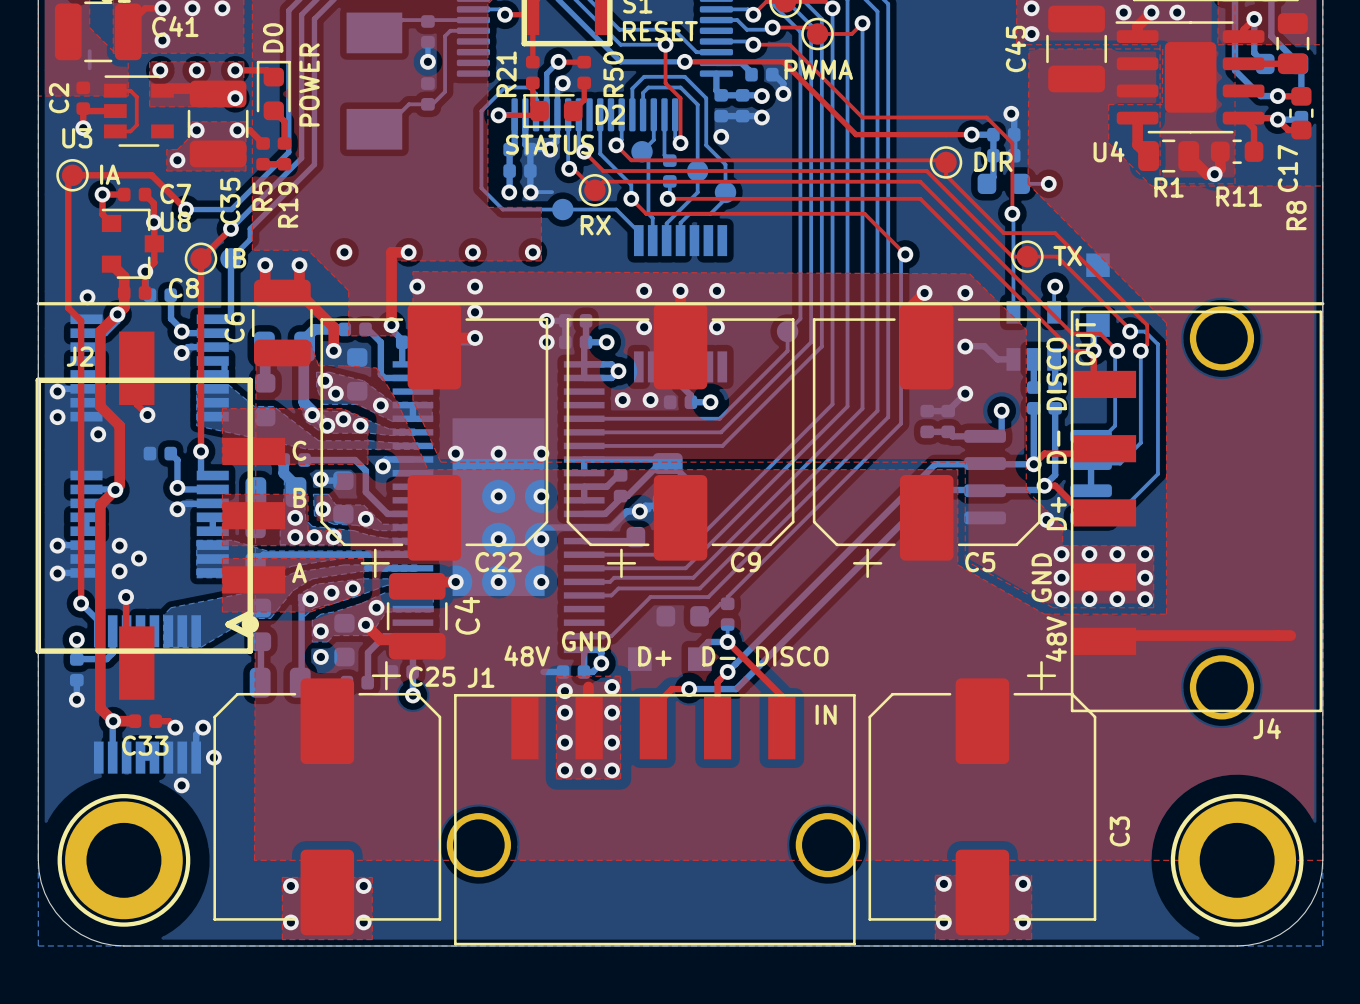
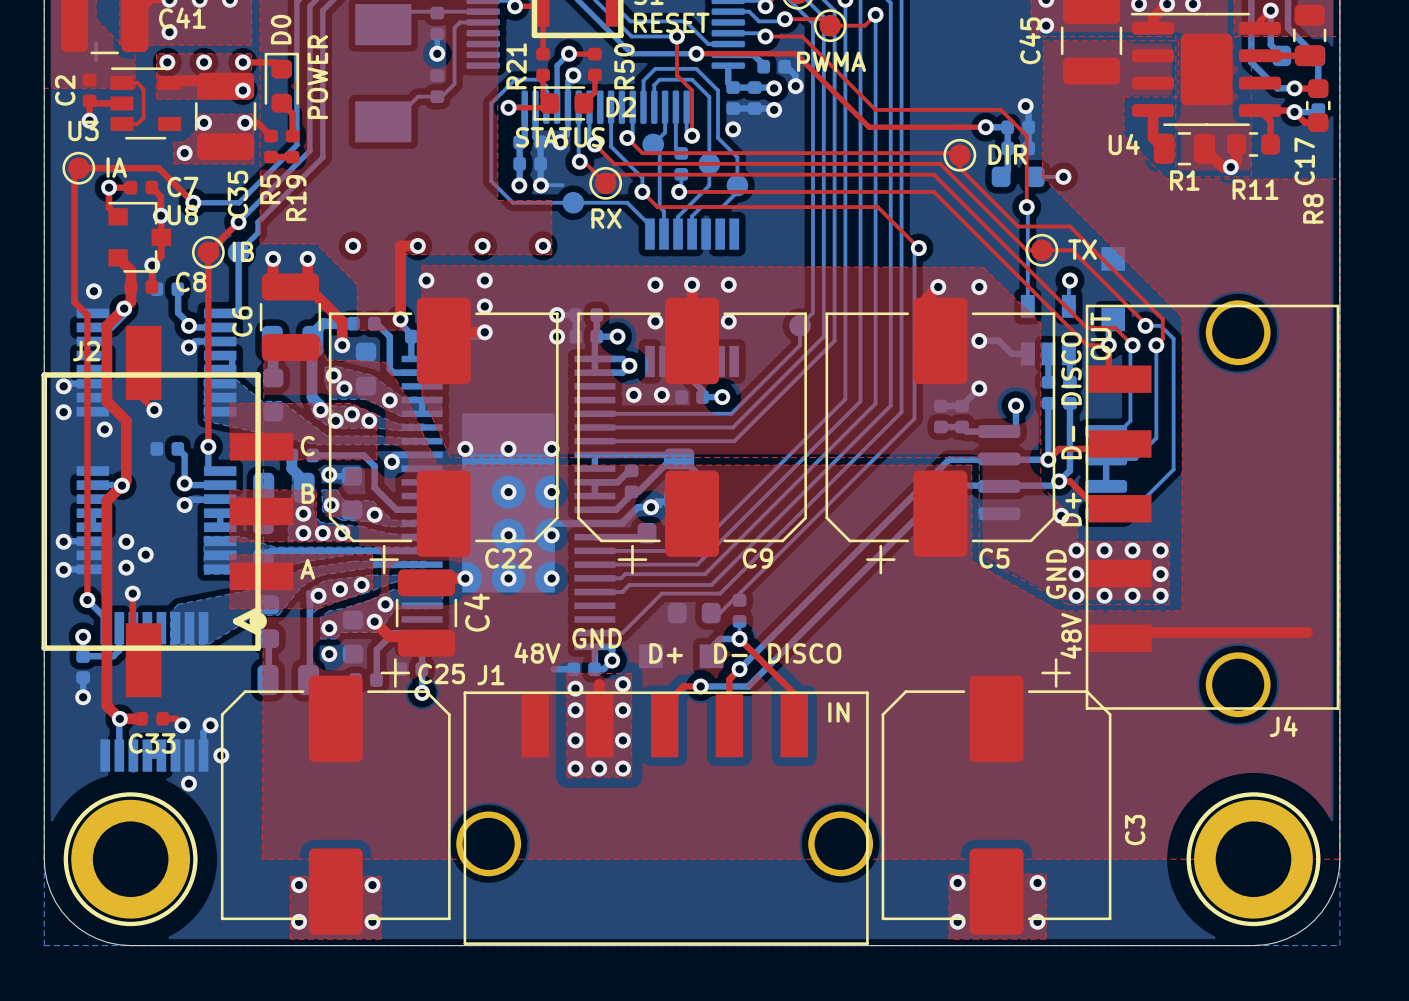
line: (38, 303) (1322, 303) -> none

